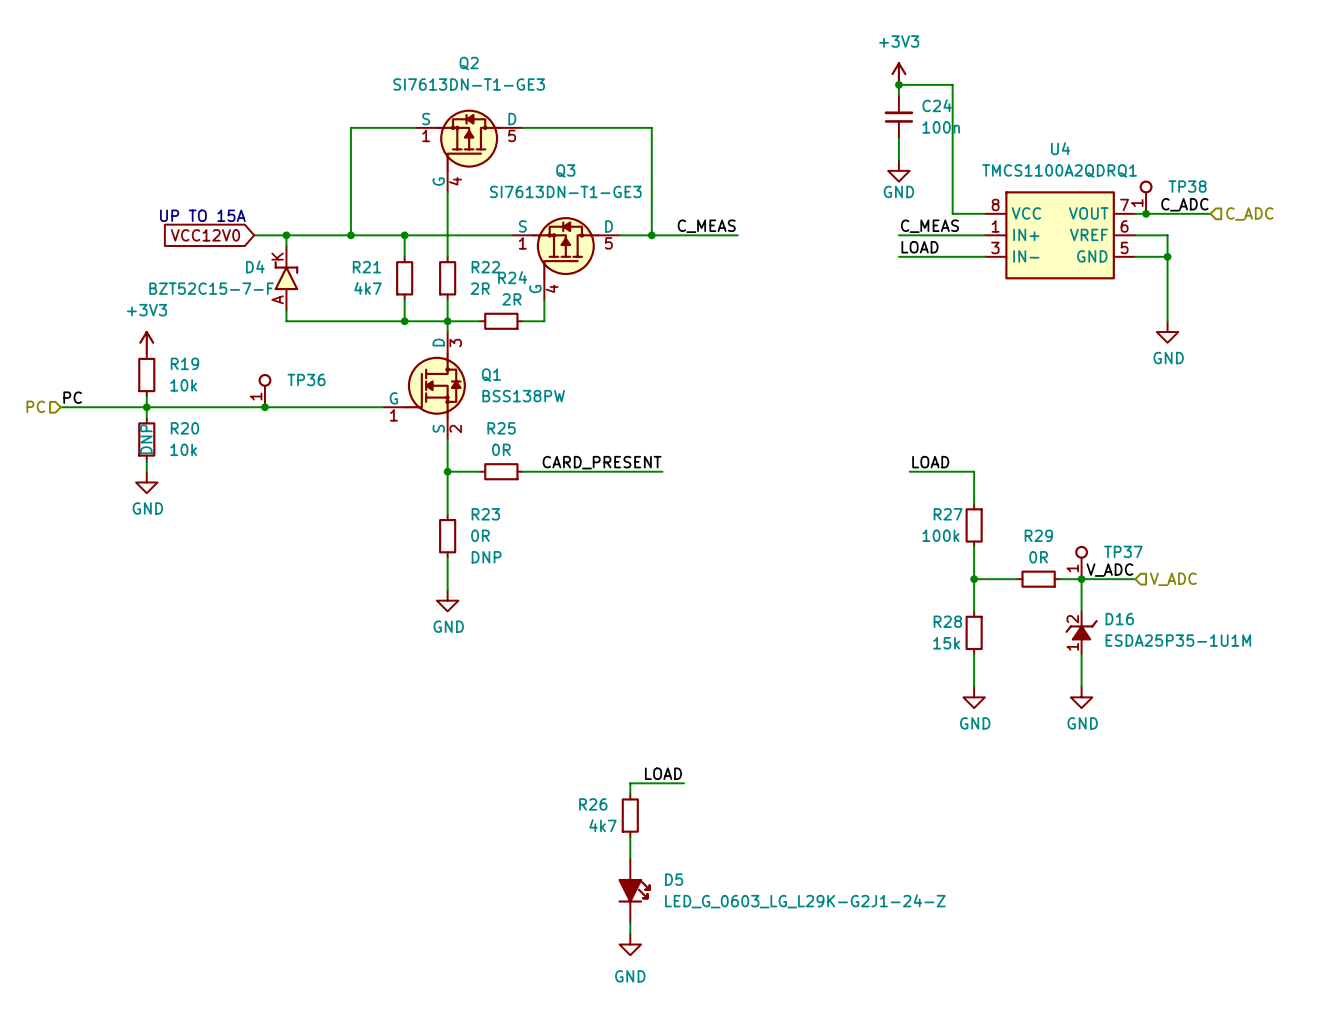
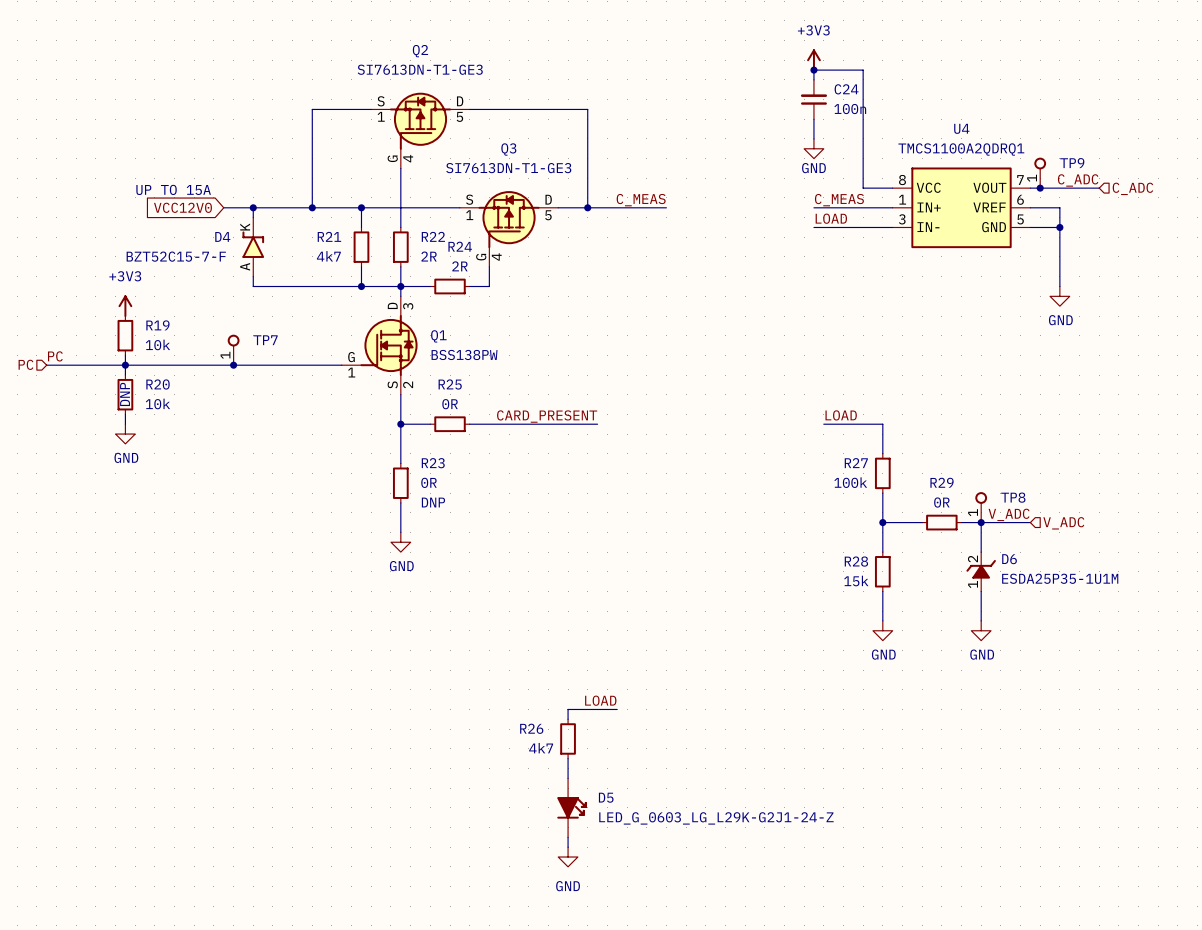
TP38 name: TP38 (1187, 186) -> TP9 (1072, 163)
TP36 name: TP36 (306, 379) -> TP7 (265, 340)
TP37 name: TP37 (1123, 551) -> TP8 (1013, 497)
D16 name: D16 (1119, 619) -> D6 (1009, 559)

